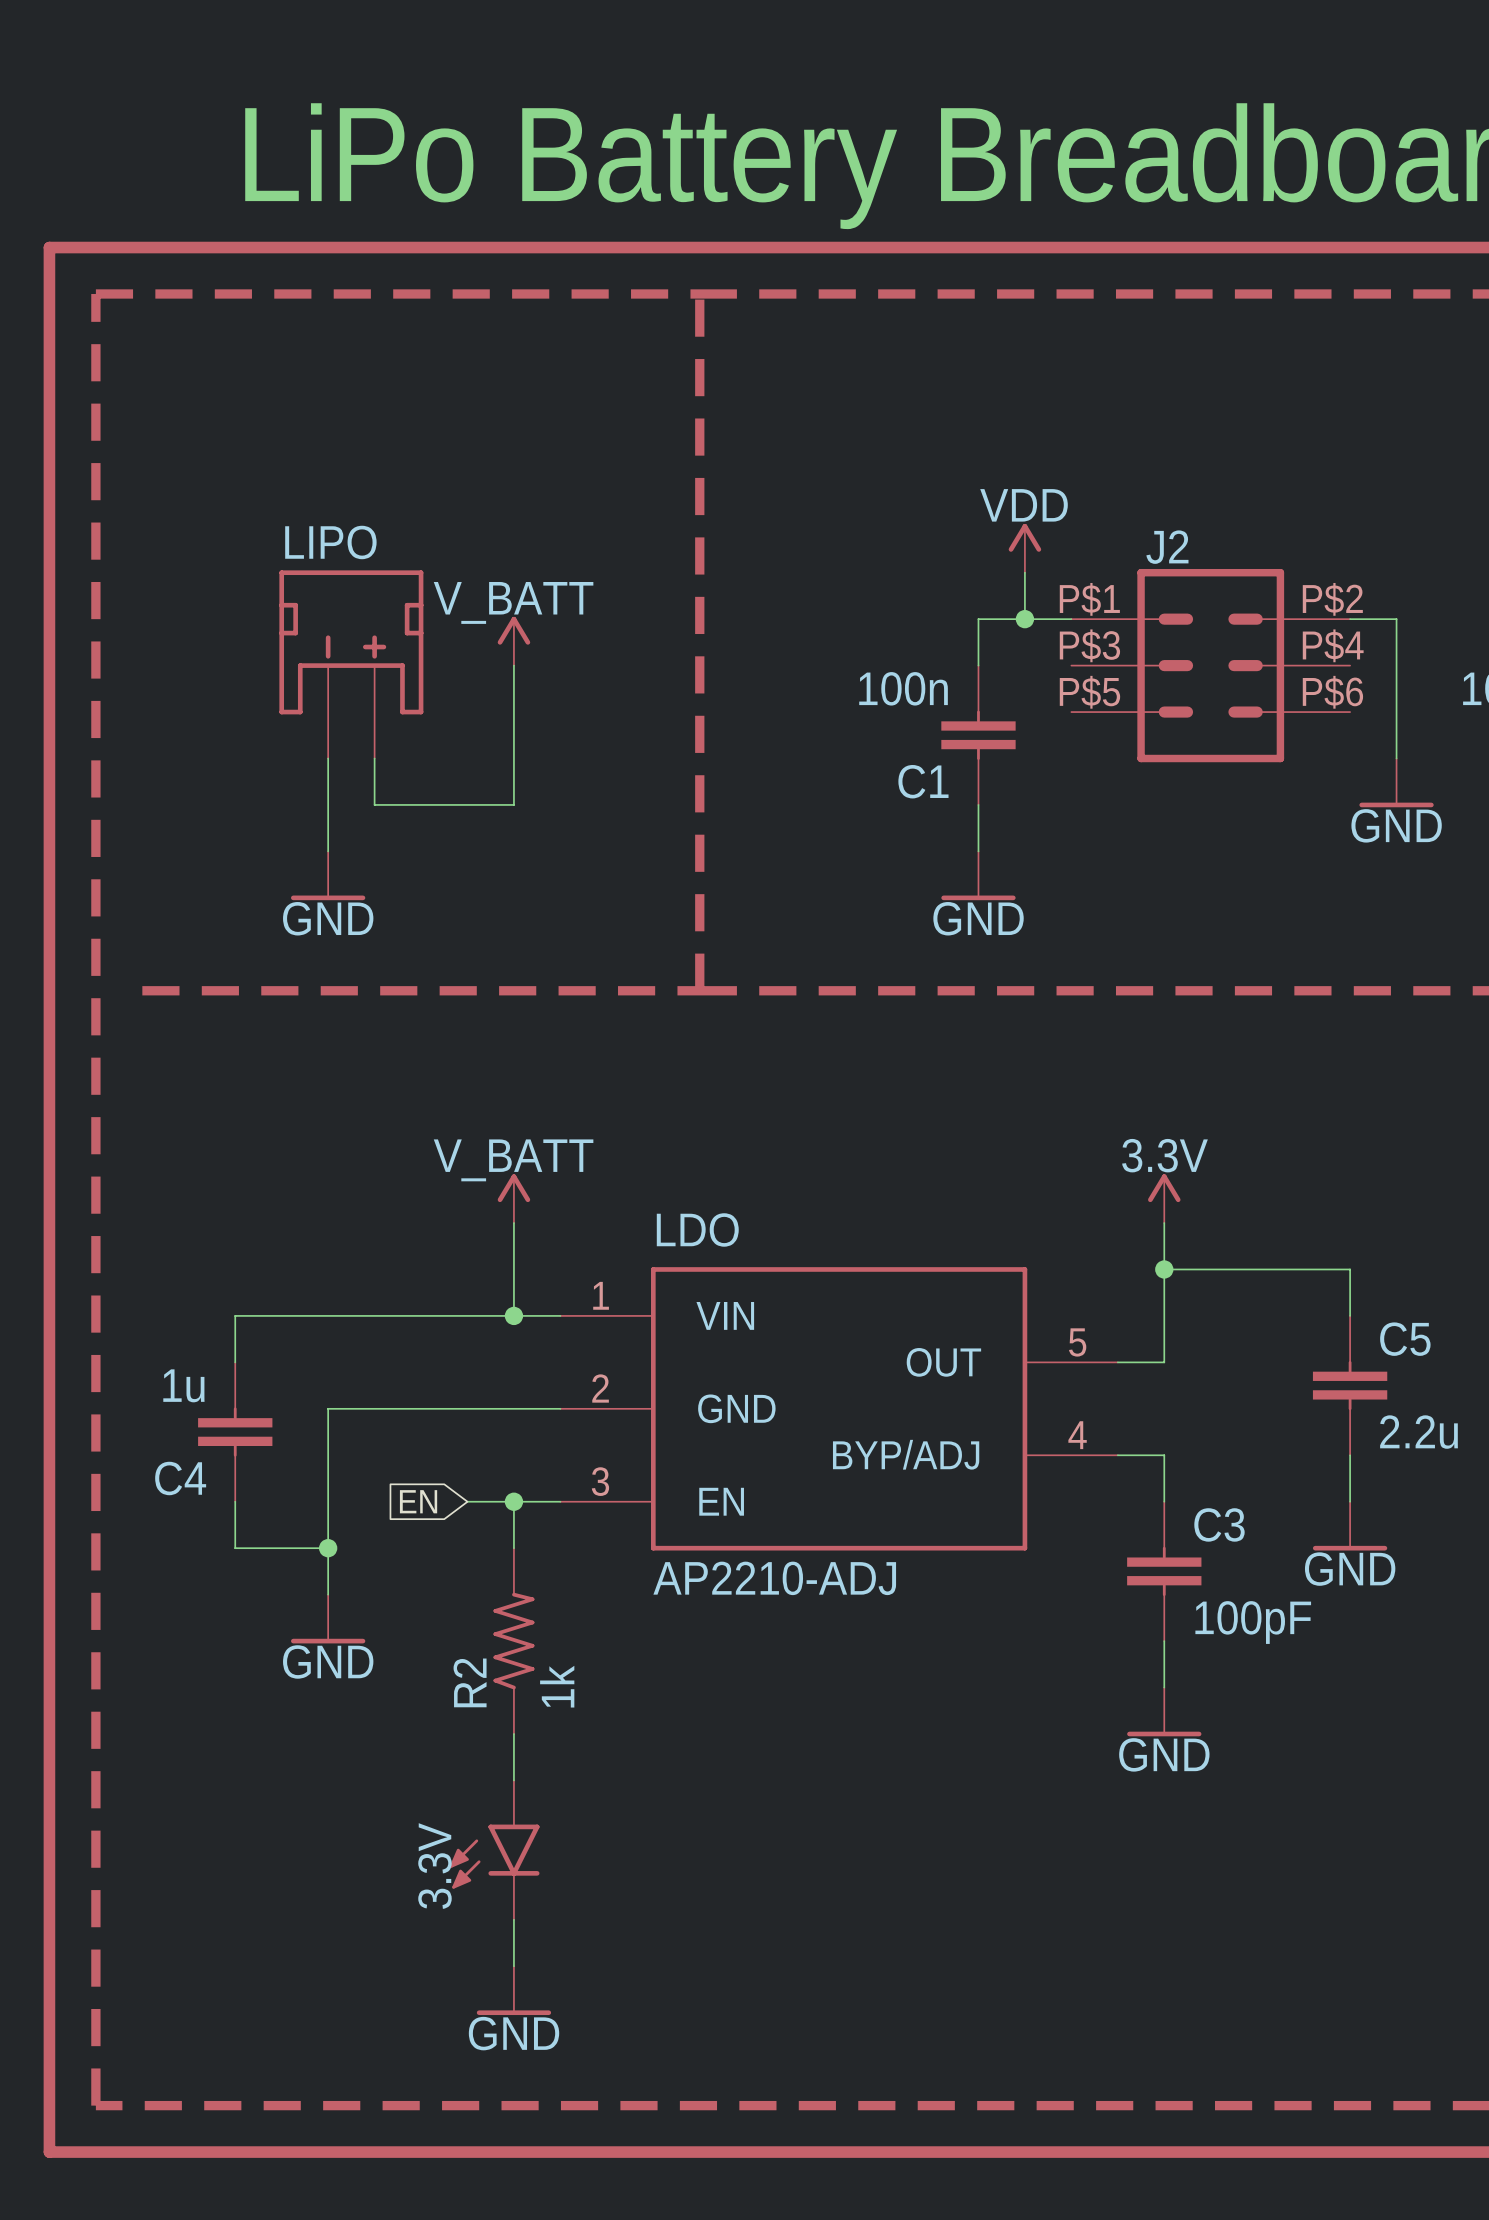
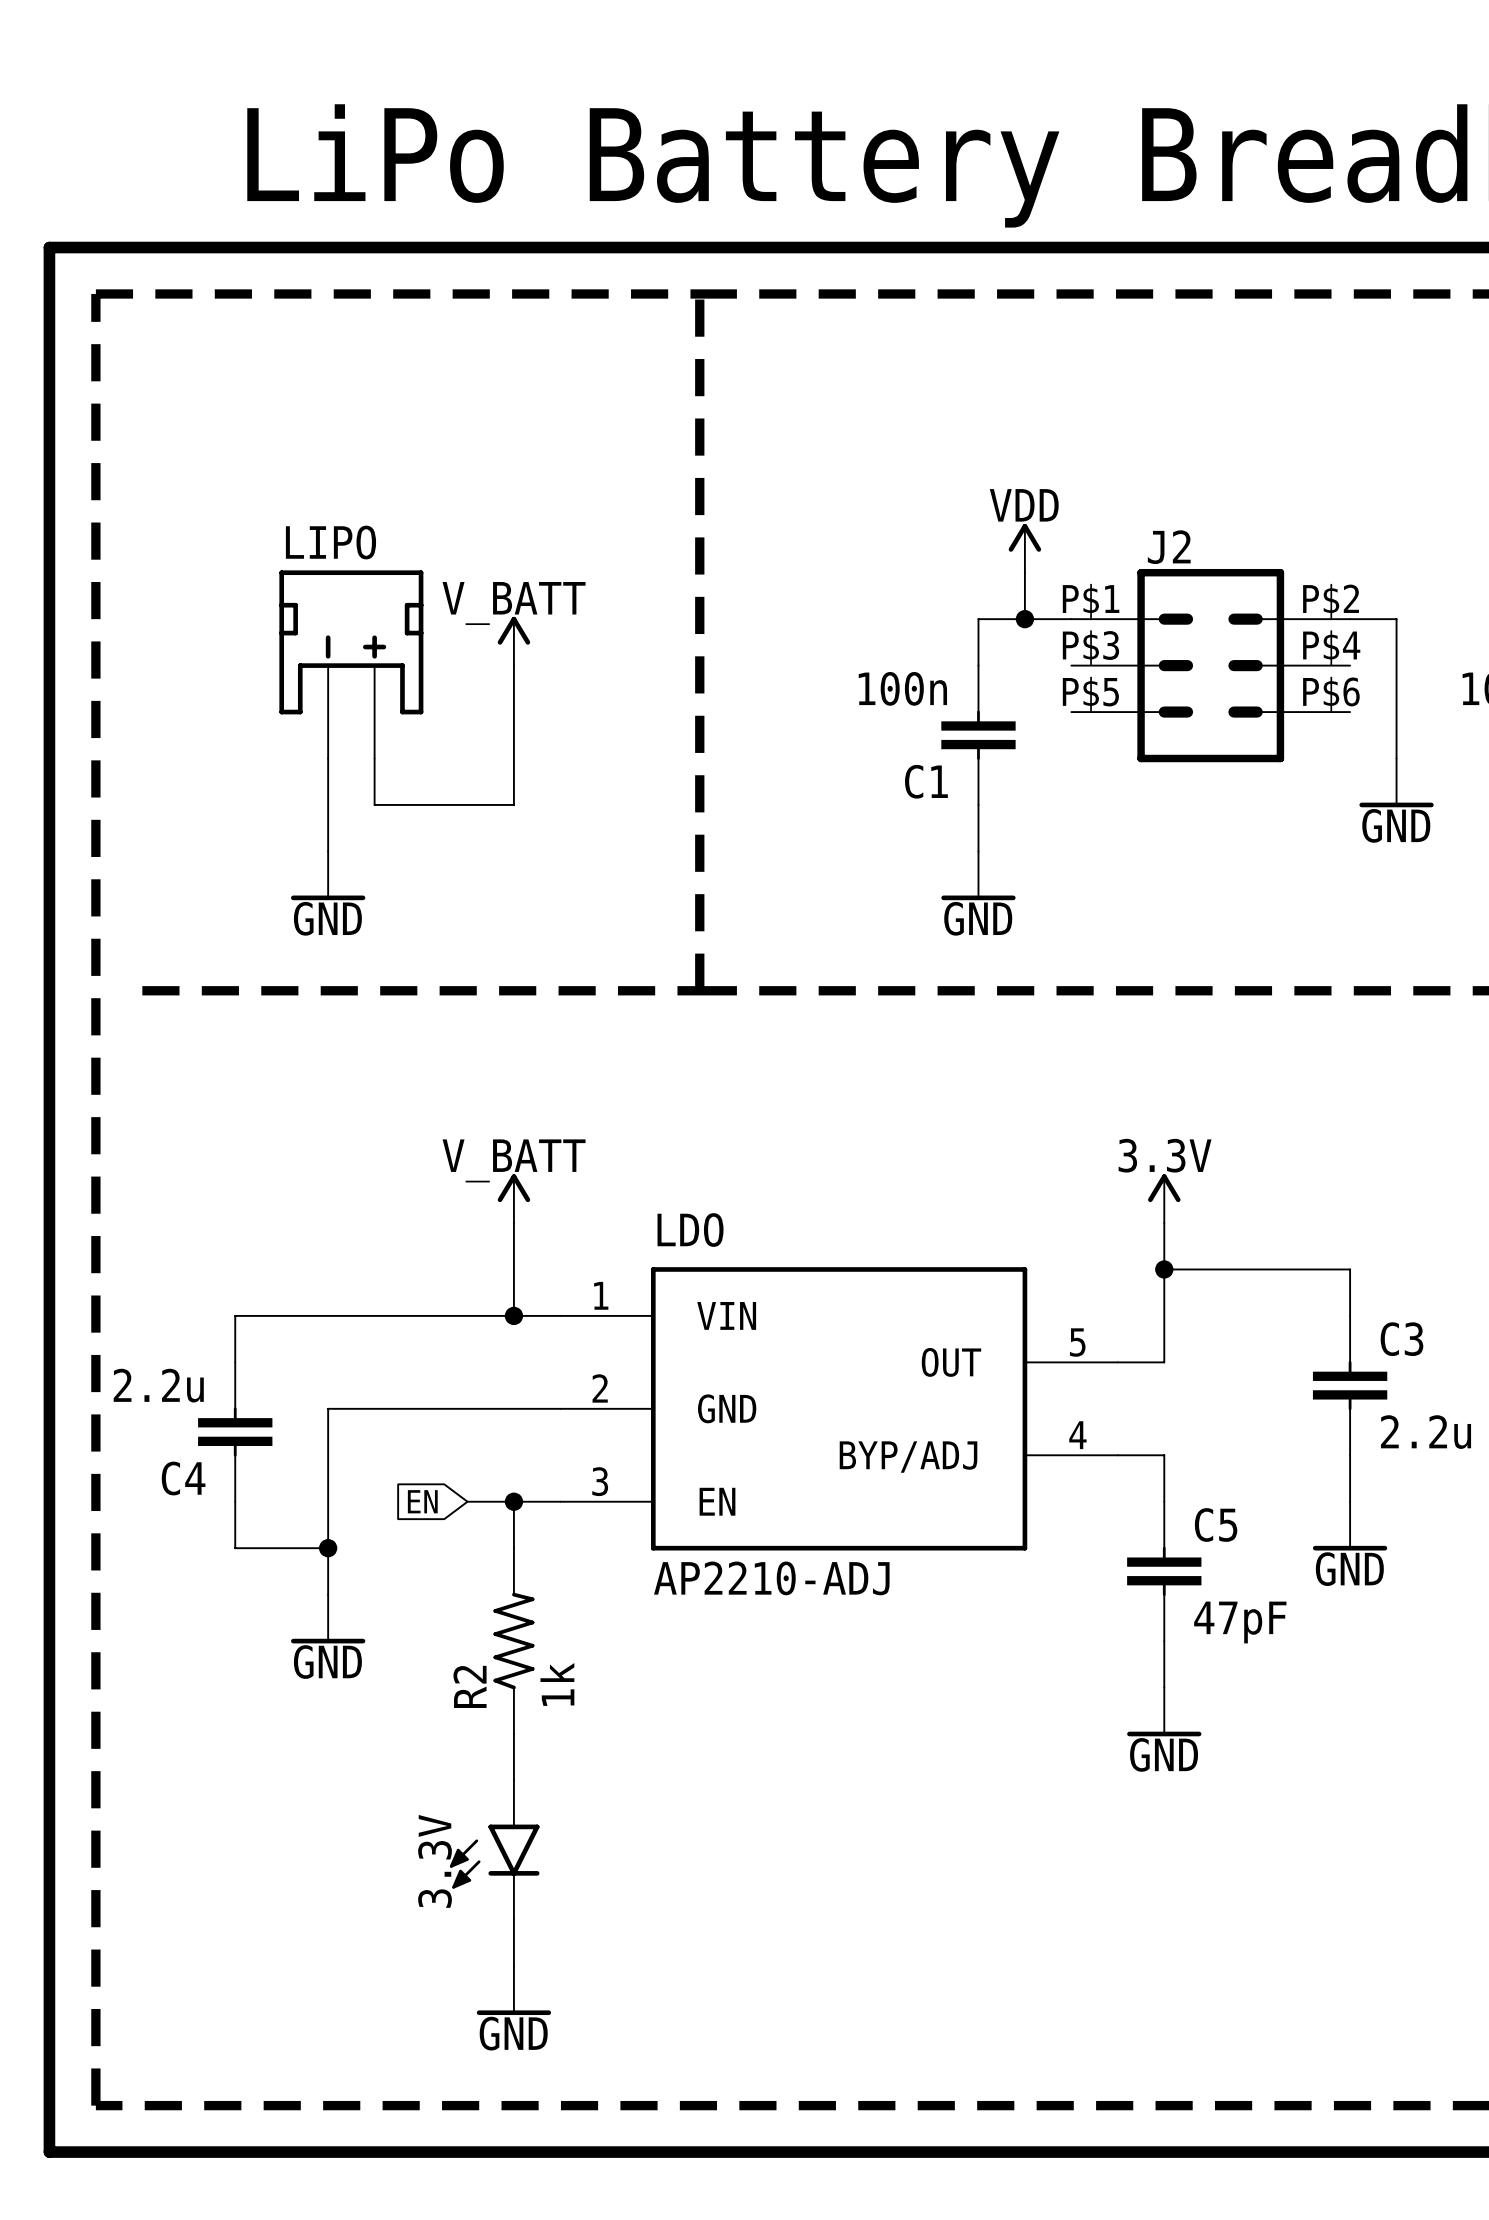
C5 name: C5 (1405, 1339) -> C3 (1401, 1339)
C4 value: 1u (183, 1385) -> 2.2u (158, 1385)
C3 name: C3 (1219, 1524) -> C5 (1216, 1524)
C3 value: 100pF (1253, 1622) -> 47pF (1240, 1622)

